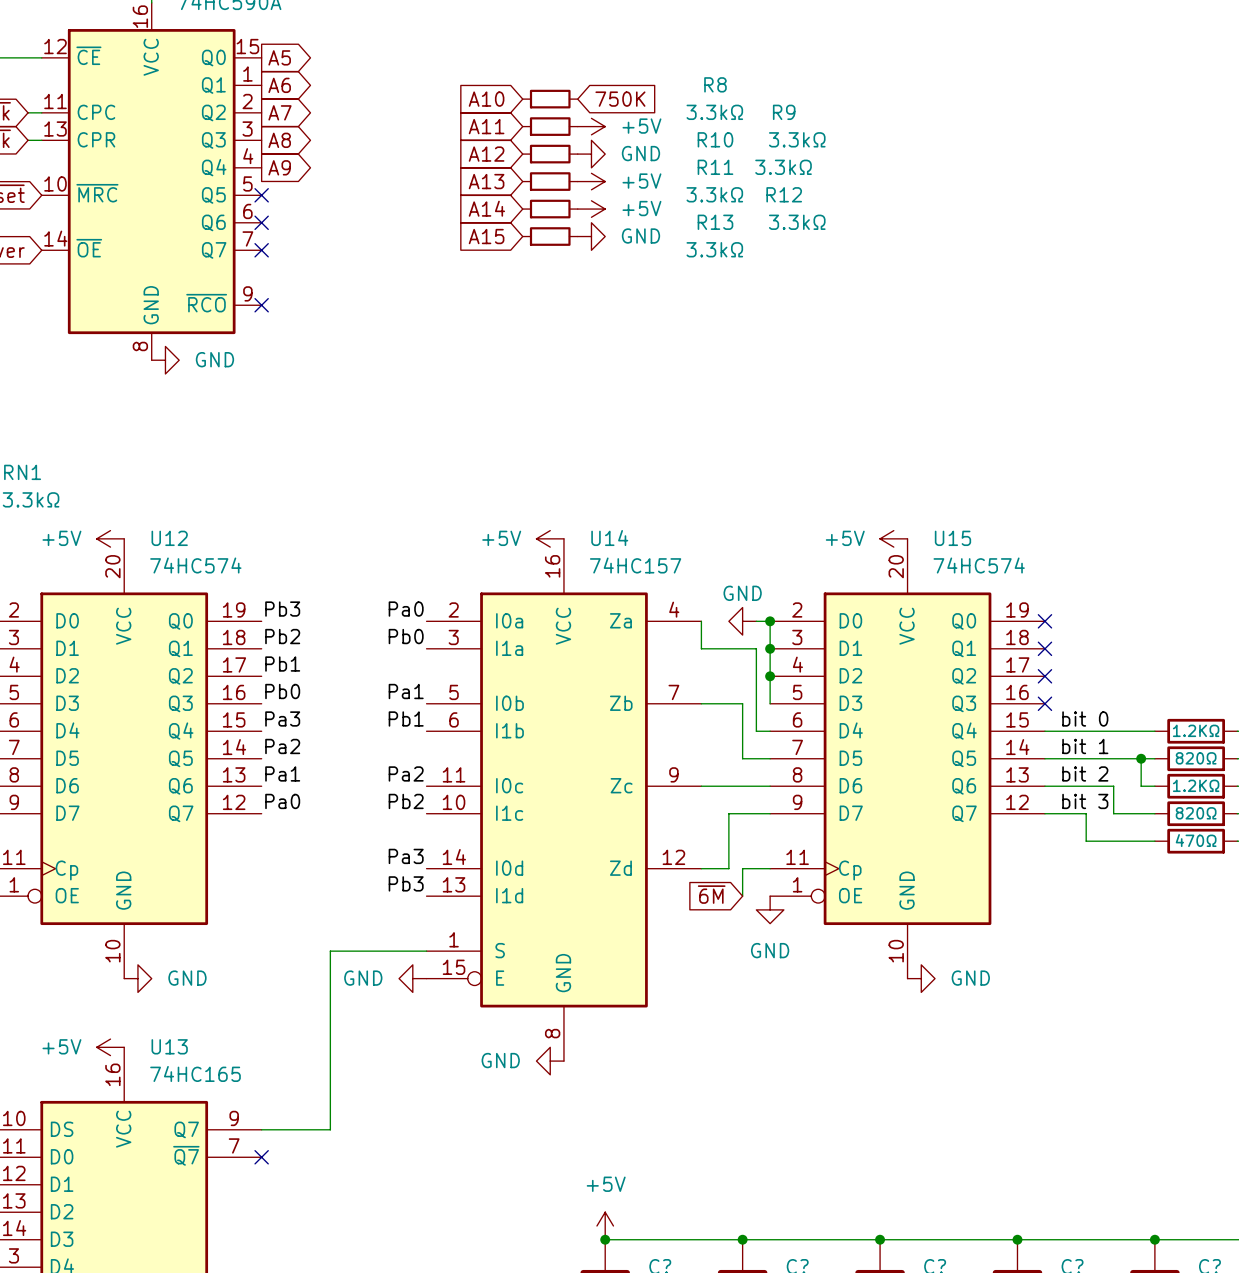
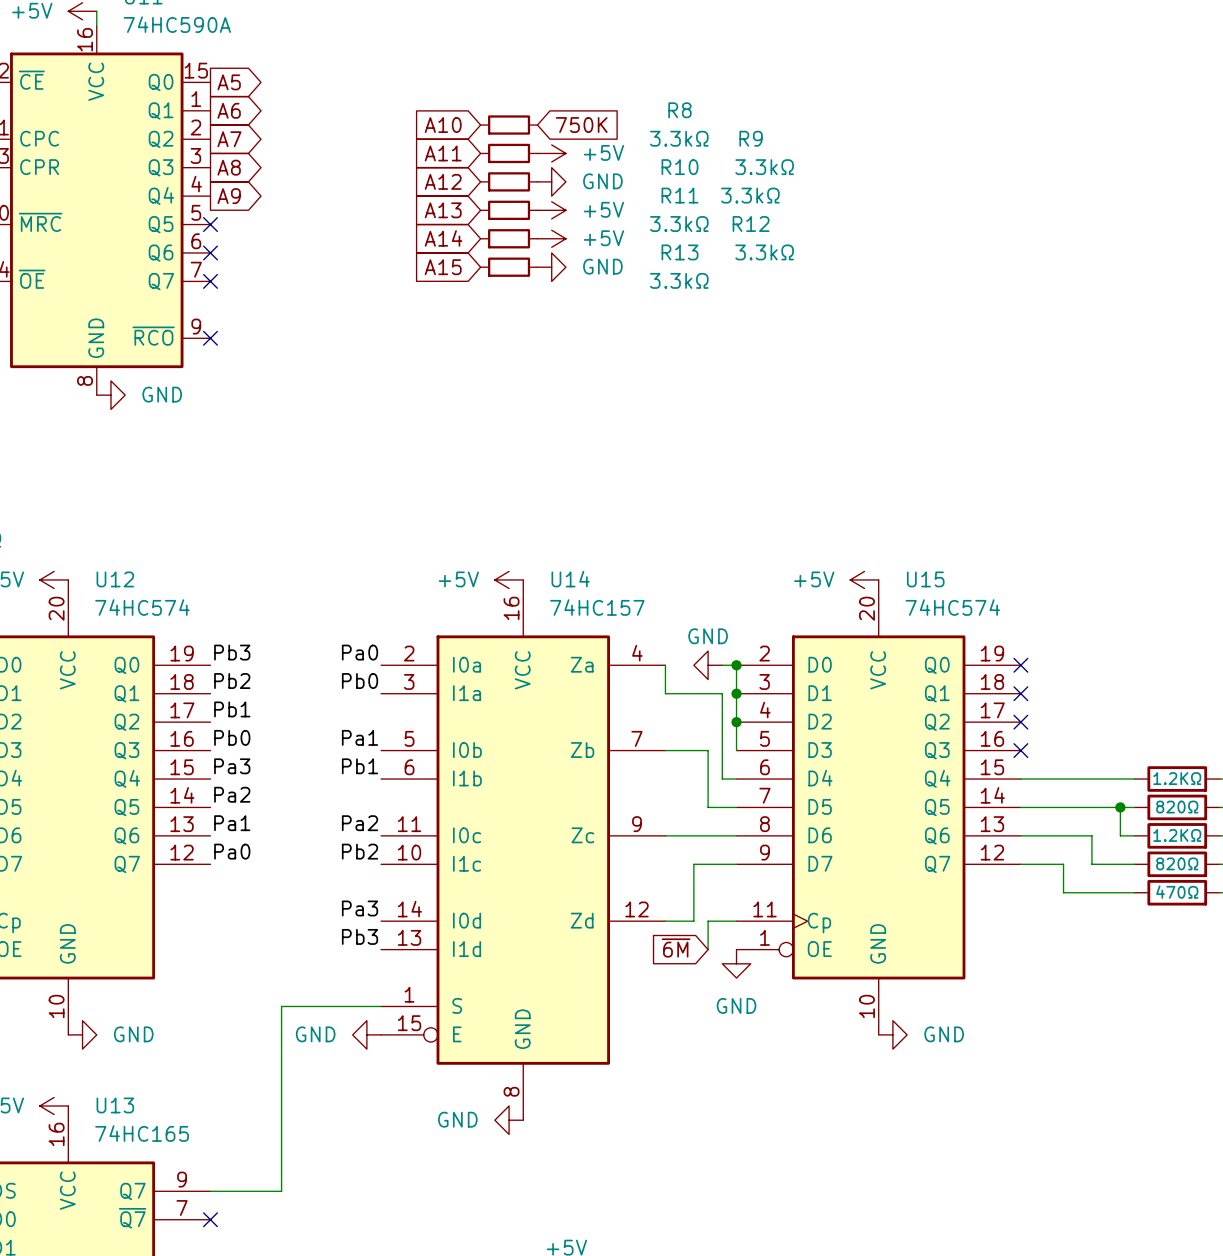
label: bit 0 (1085, 718) -> none
label: bit 1 (1085, 746) -> none
label: bit 2 (1085, 773) -> none
label: bit 3 (1085, 801) -> none

